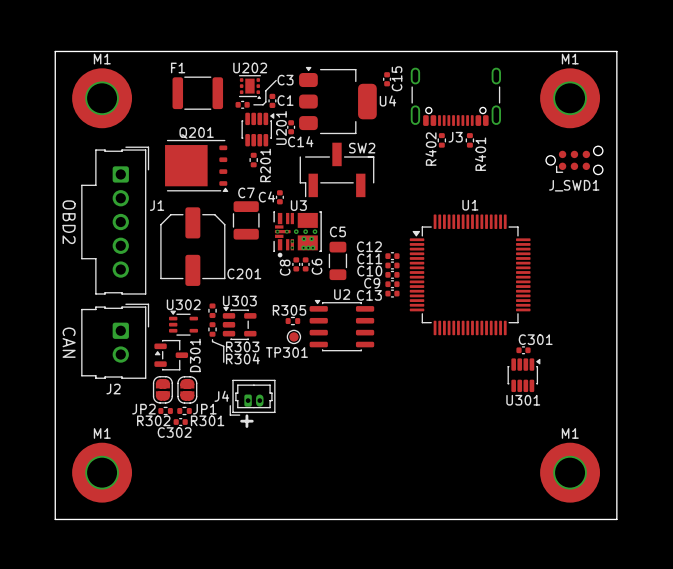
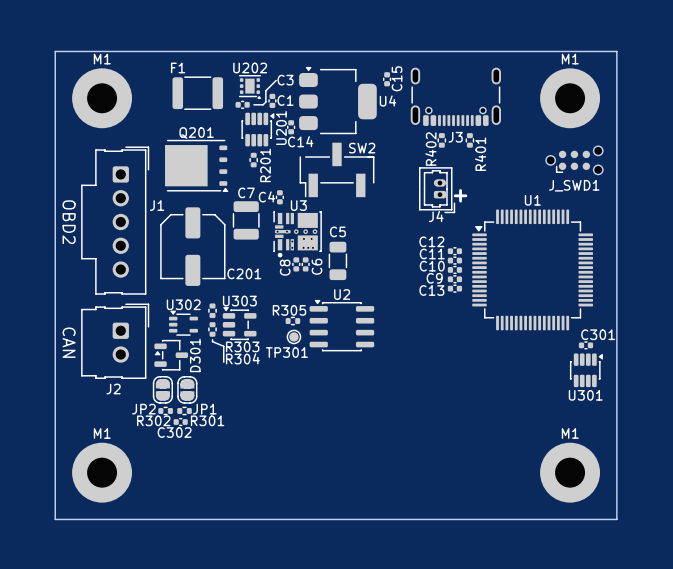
text: none -> + (460, 195)
C12 position: (392, 256) -> (454, 251)
C11 position: (392, 265) -> (454, 260)
C10 position: (392, 274) -> (454, 269)
U1 position: (470, 274) -> (532, 269)
C9 position: (392, 284) -> (454, 279)
C13 position: (392, 293) -> (454, 288)
C301 position: (523, 350) -> (585, 345)
U301 position: (524, 375) -> (586, 370)
J4 rotation: 0° (252, 397) -> 90° counterclockwise (437, 190)
J4 position: (252, 397) -> (437, 190)
text: + (246, 421) -> none

